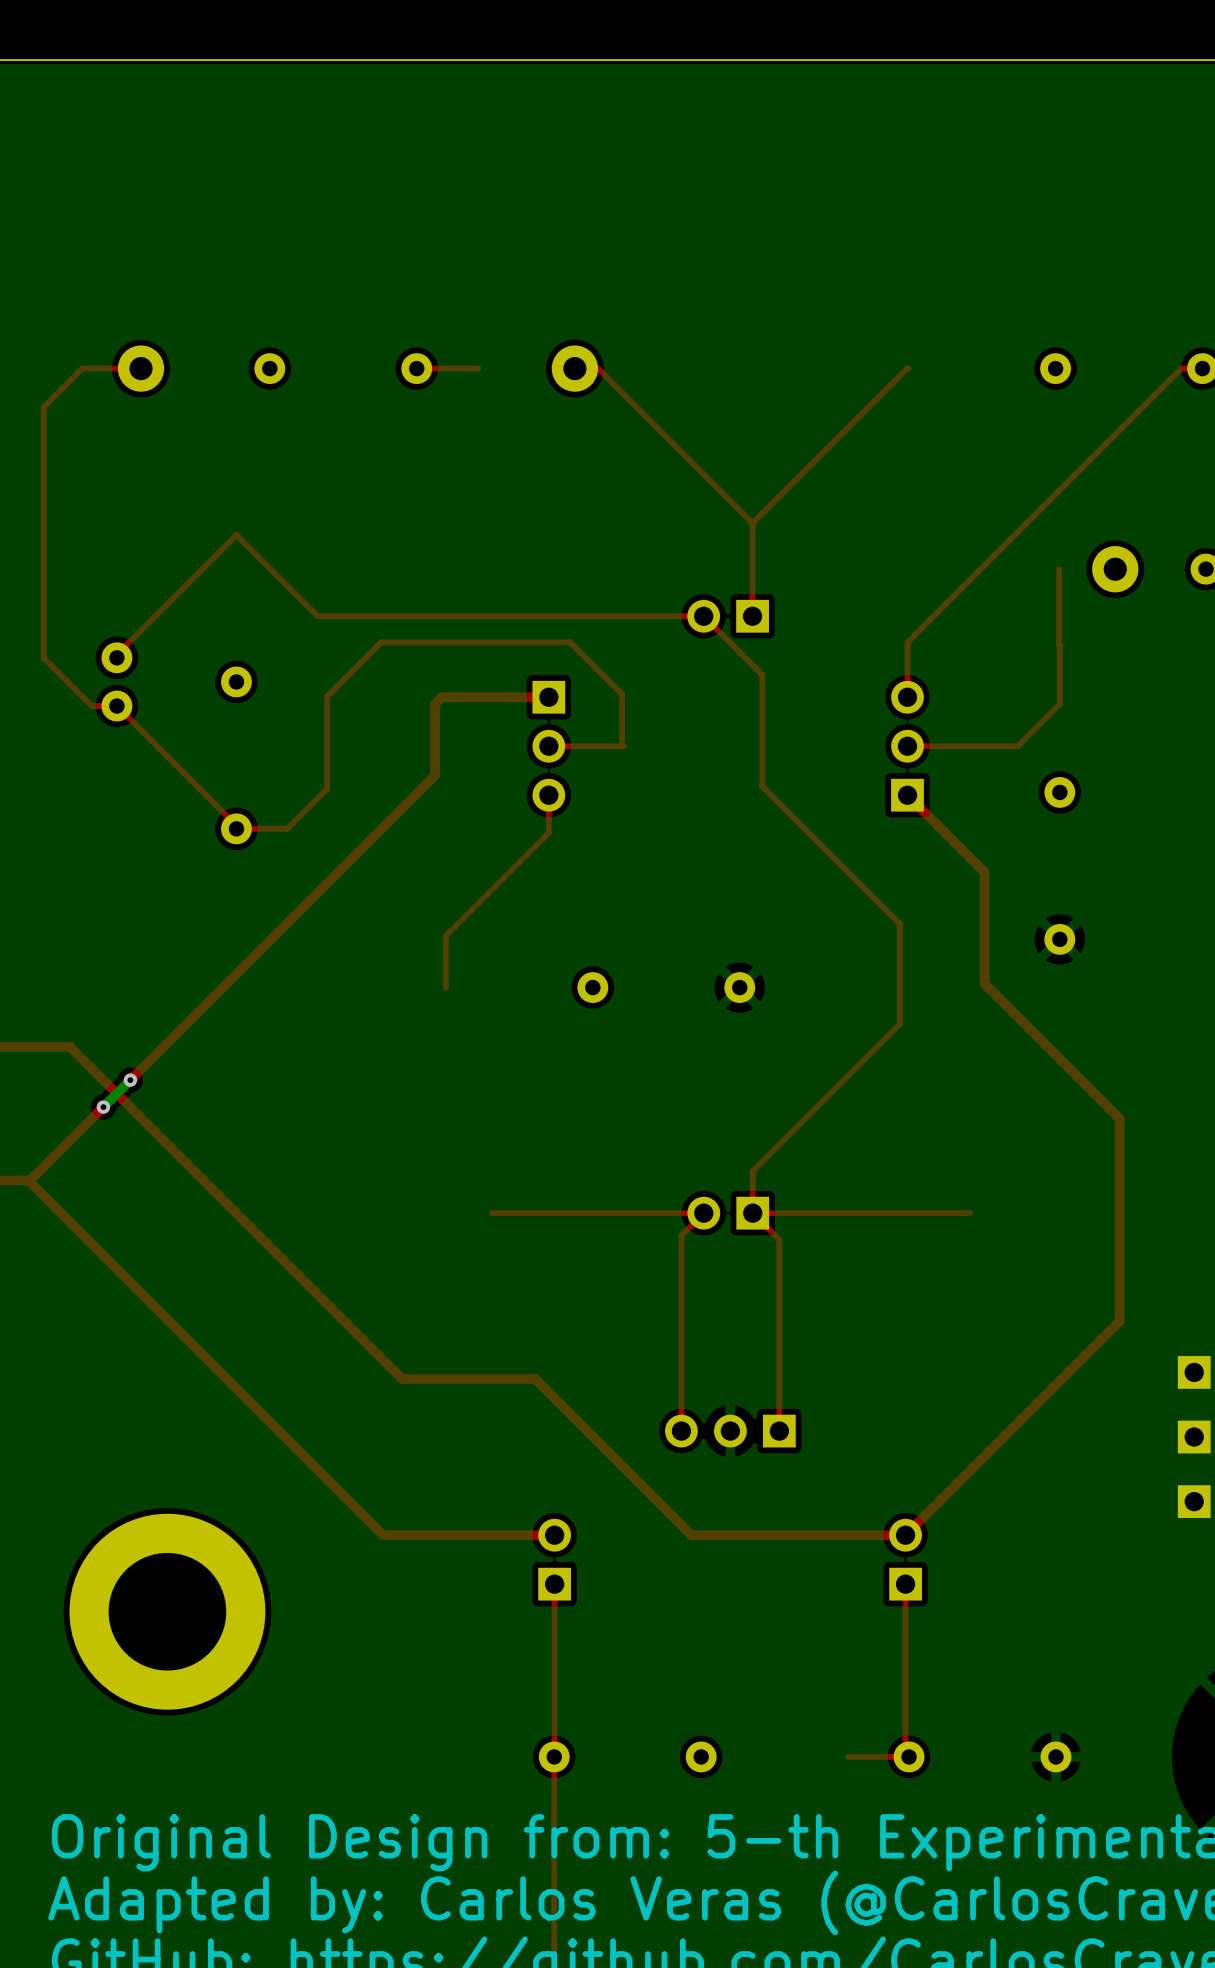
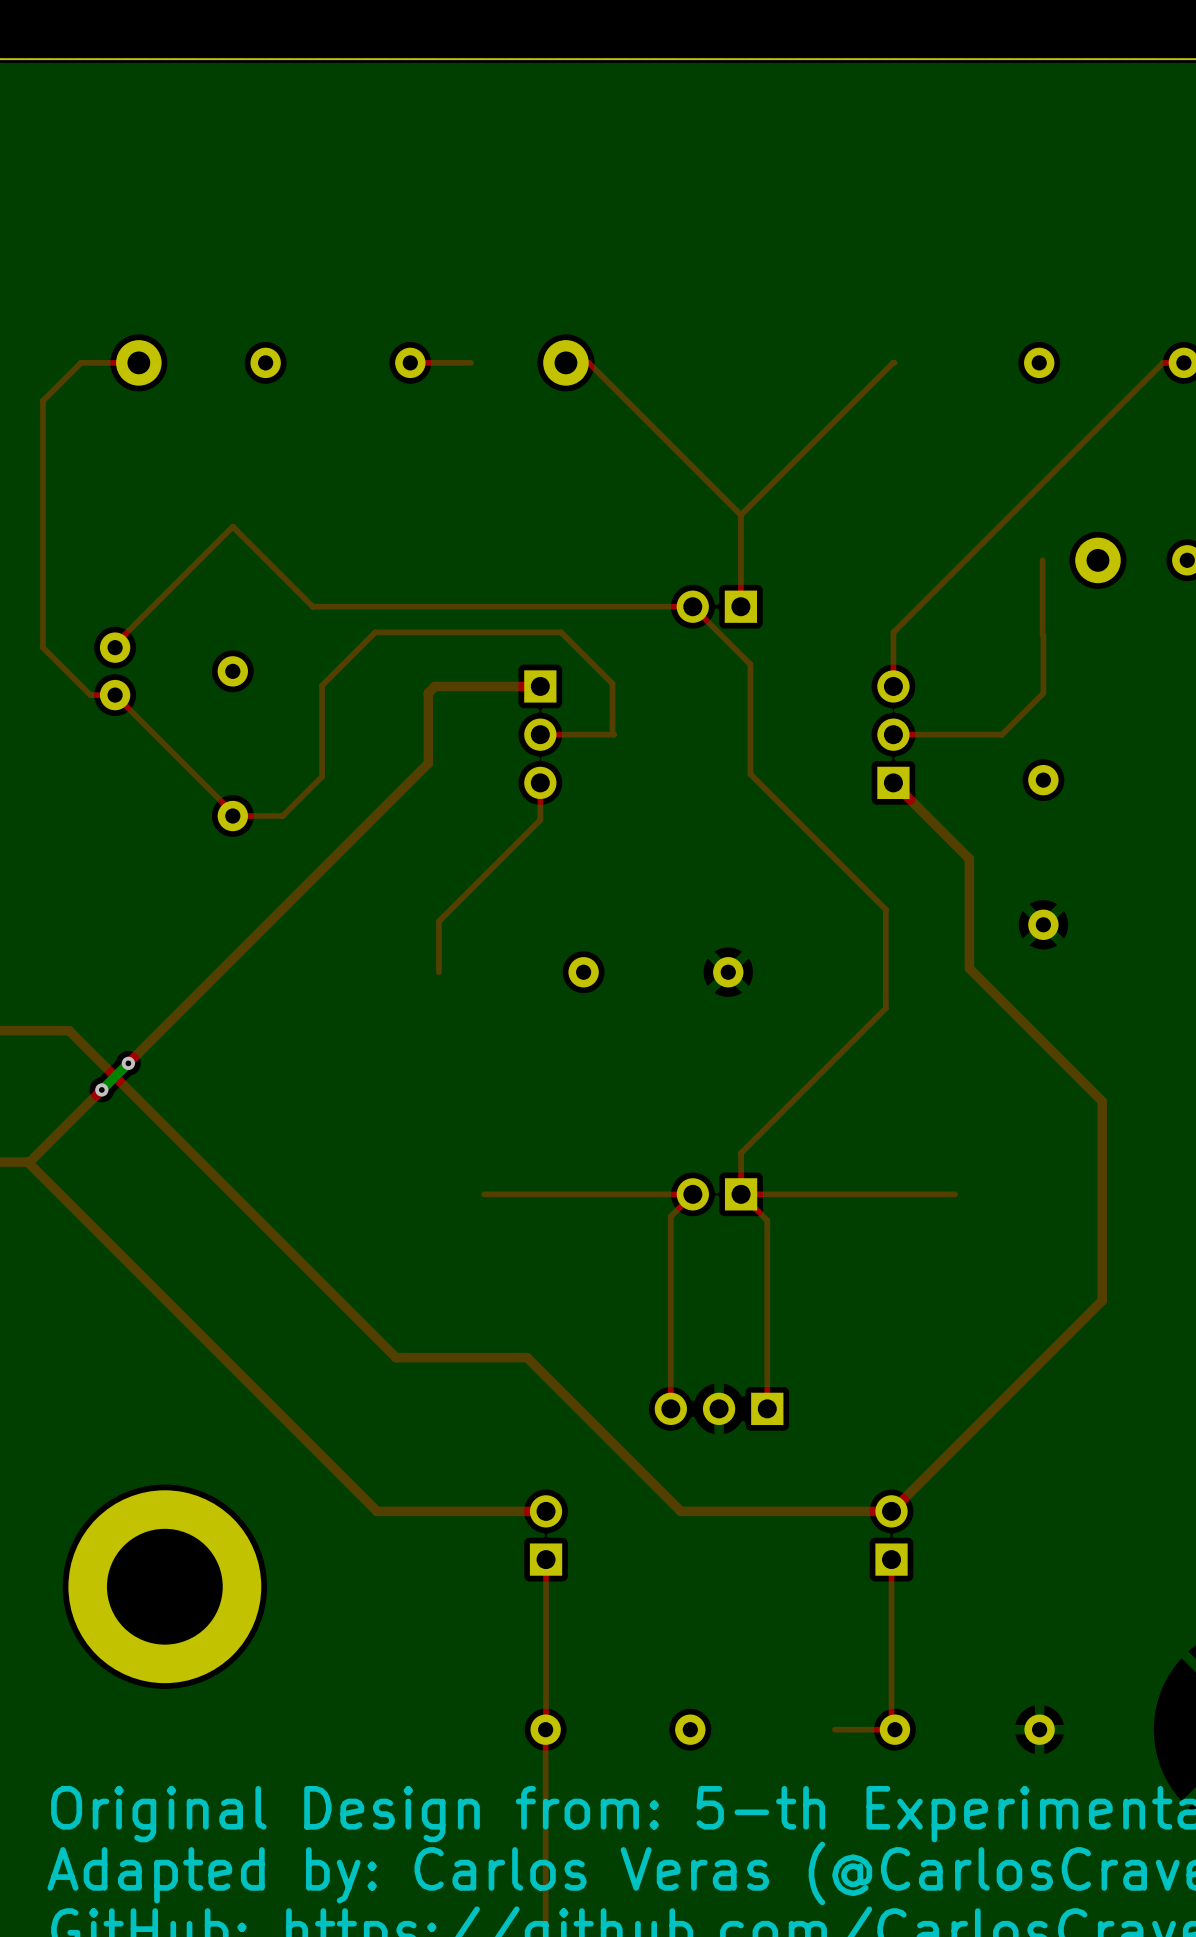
part: (1194, 1372) -> none
part: (1194, 1437) -> none
part: (1194, 1501) -> none

